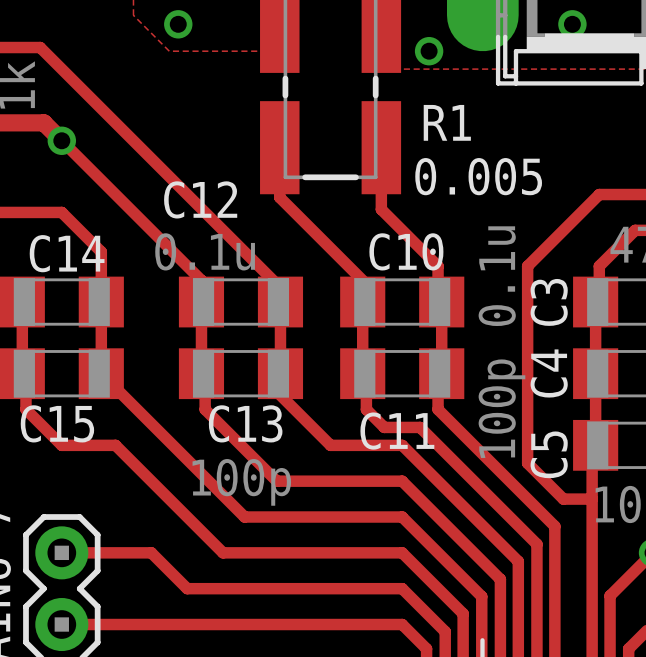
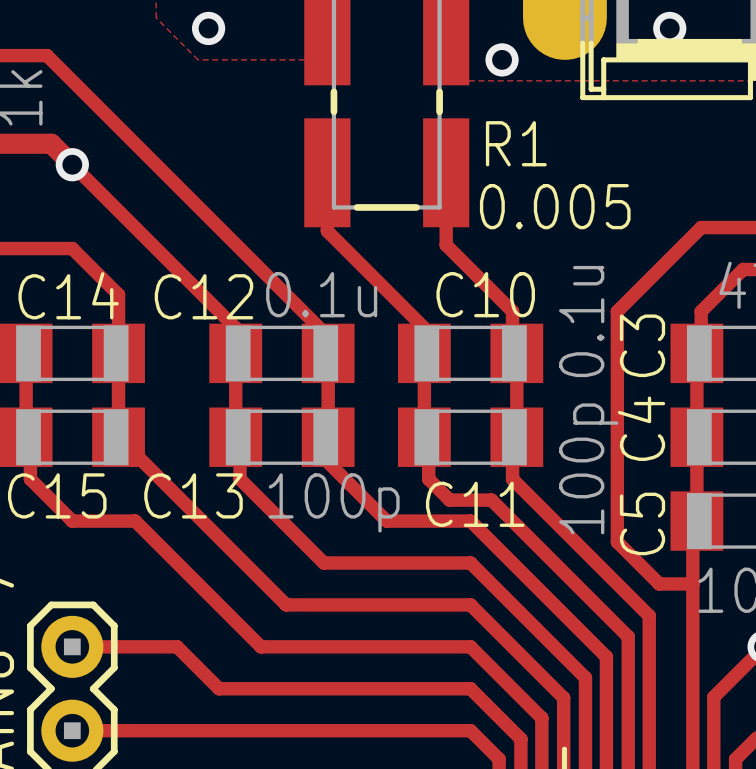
C12 name position: C12 (200, 199) -> C12 (203, 296)
C12 value position: 0.1u (205, 251) -> 0.1u (321, 294)
C13 name position: C13 (245, 423) -> C13 (193, 495)
C13 value position: 100p (241, 482) -> 100p (334, 502)

